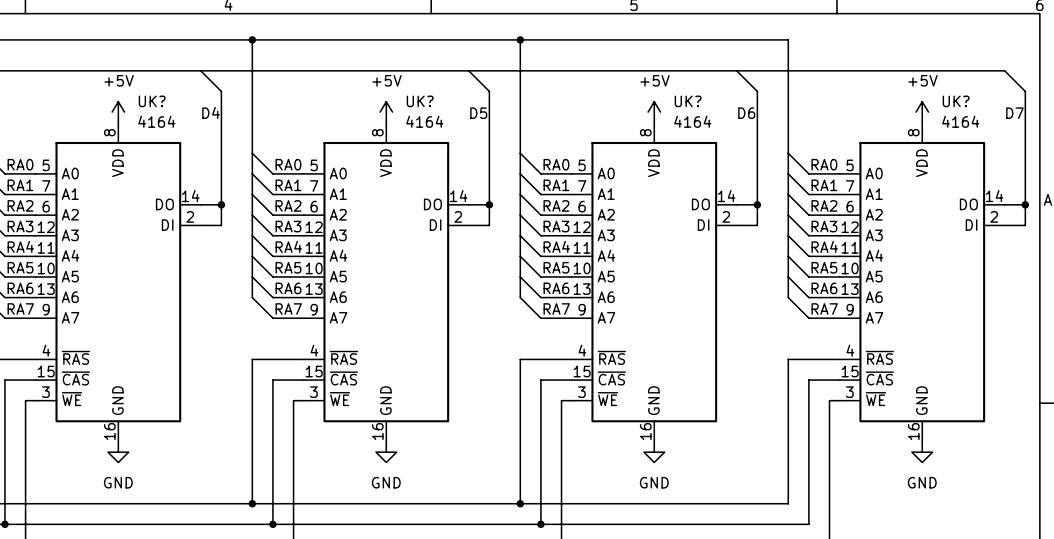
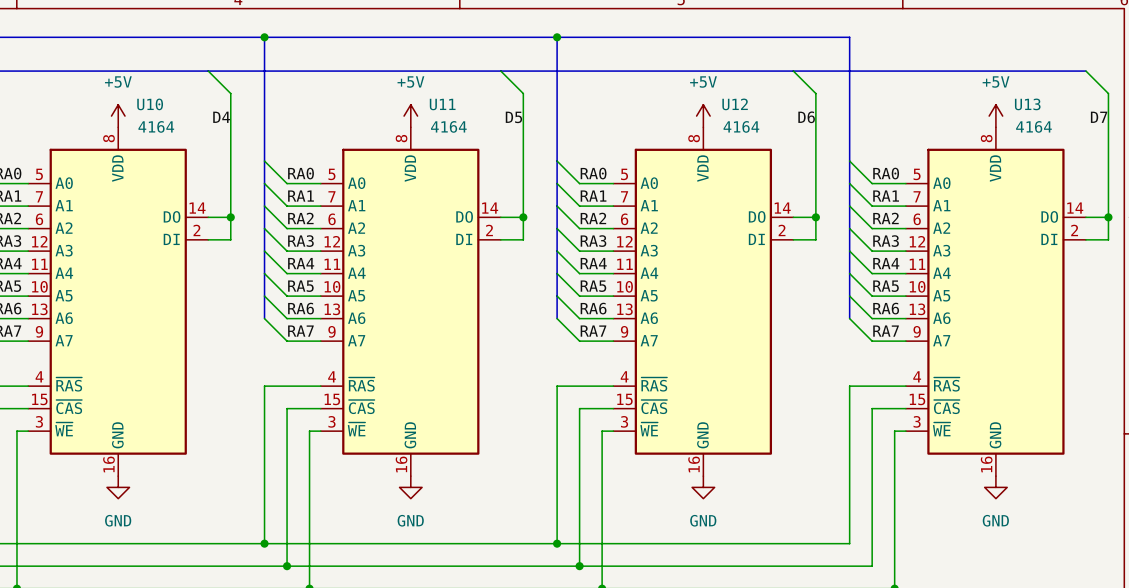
UK? name: UK? (152, 101) -> U10 (150, 104)
UK? name: UK? (420, 101) -> U11 (442, 104)
UK? name: UK? (688, 101) -> U12 (735, 104)
UK? name: UK? (956, 101) -> U13 (1027, 104)

